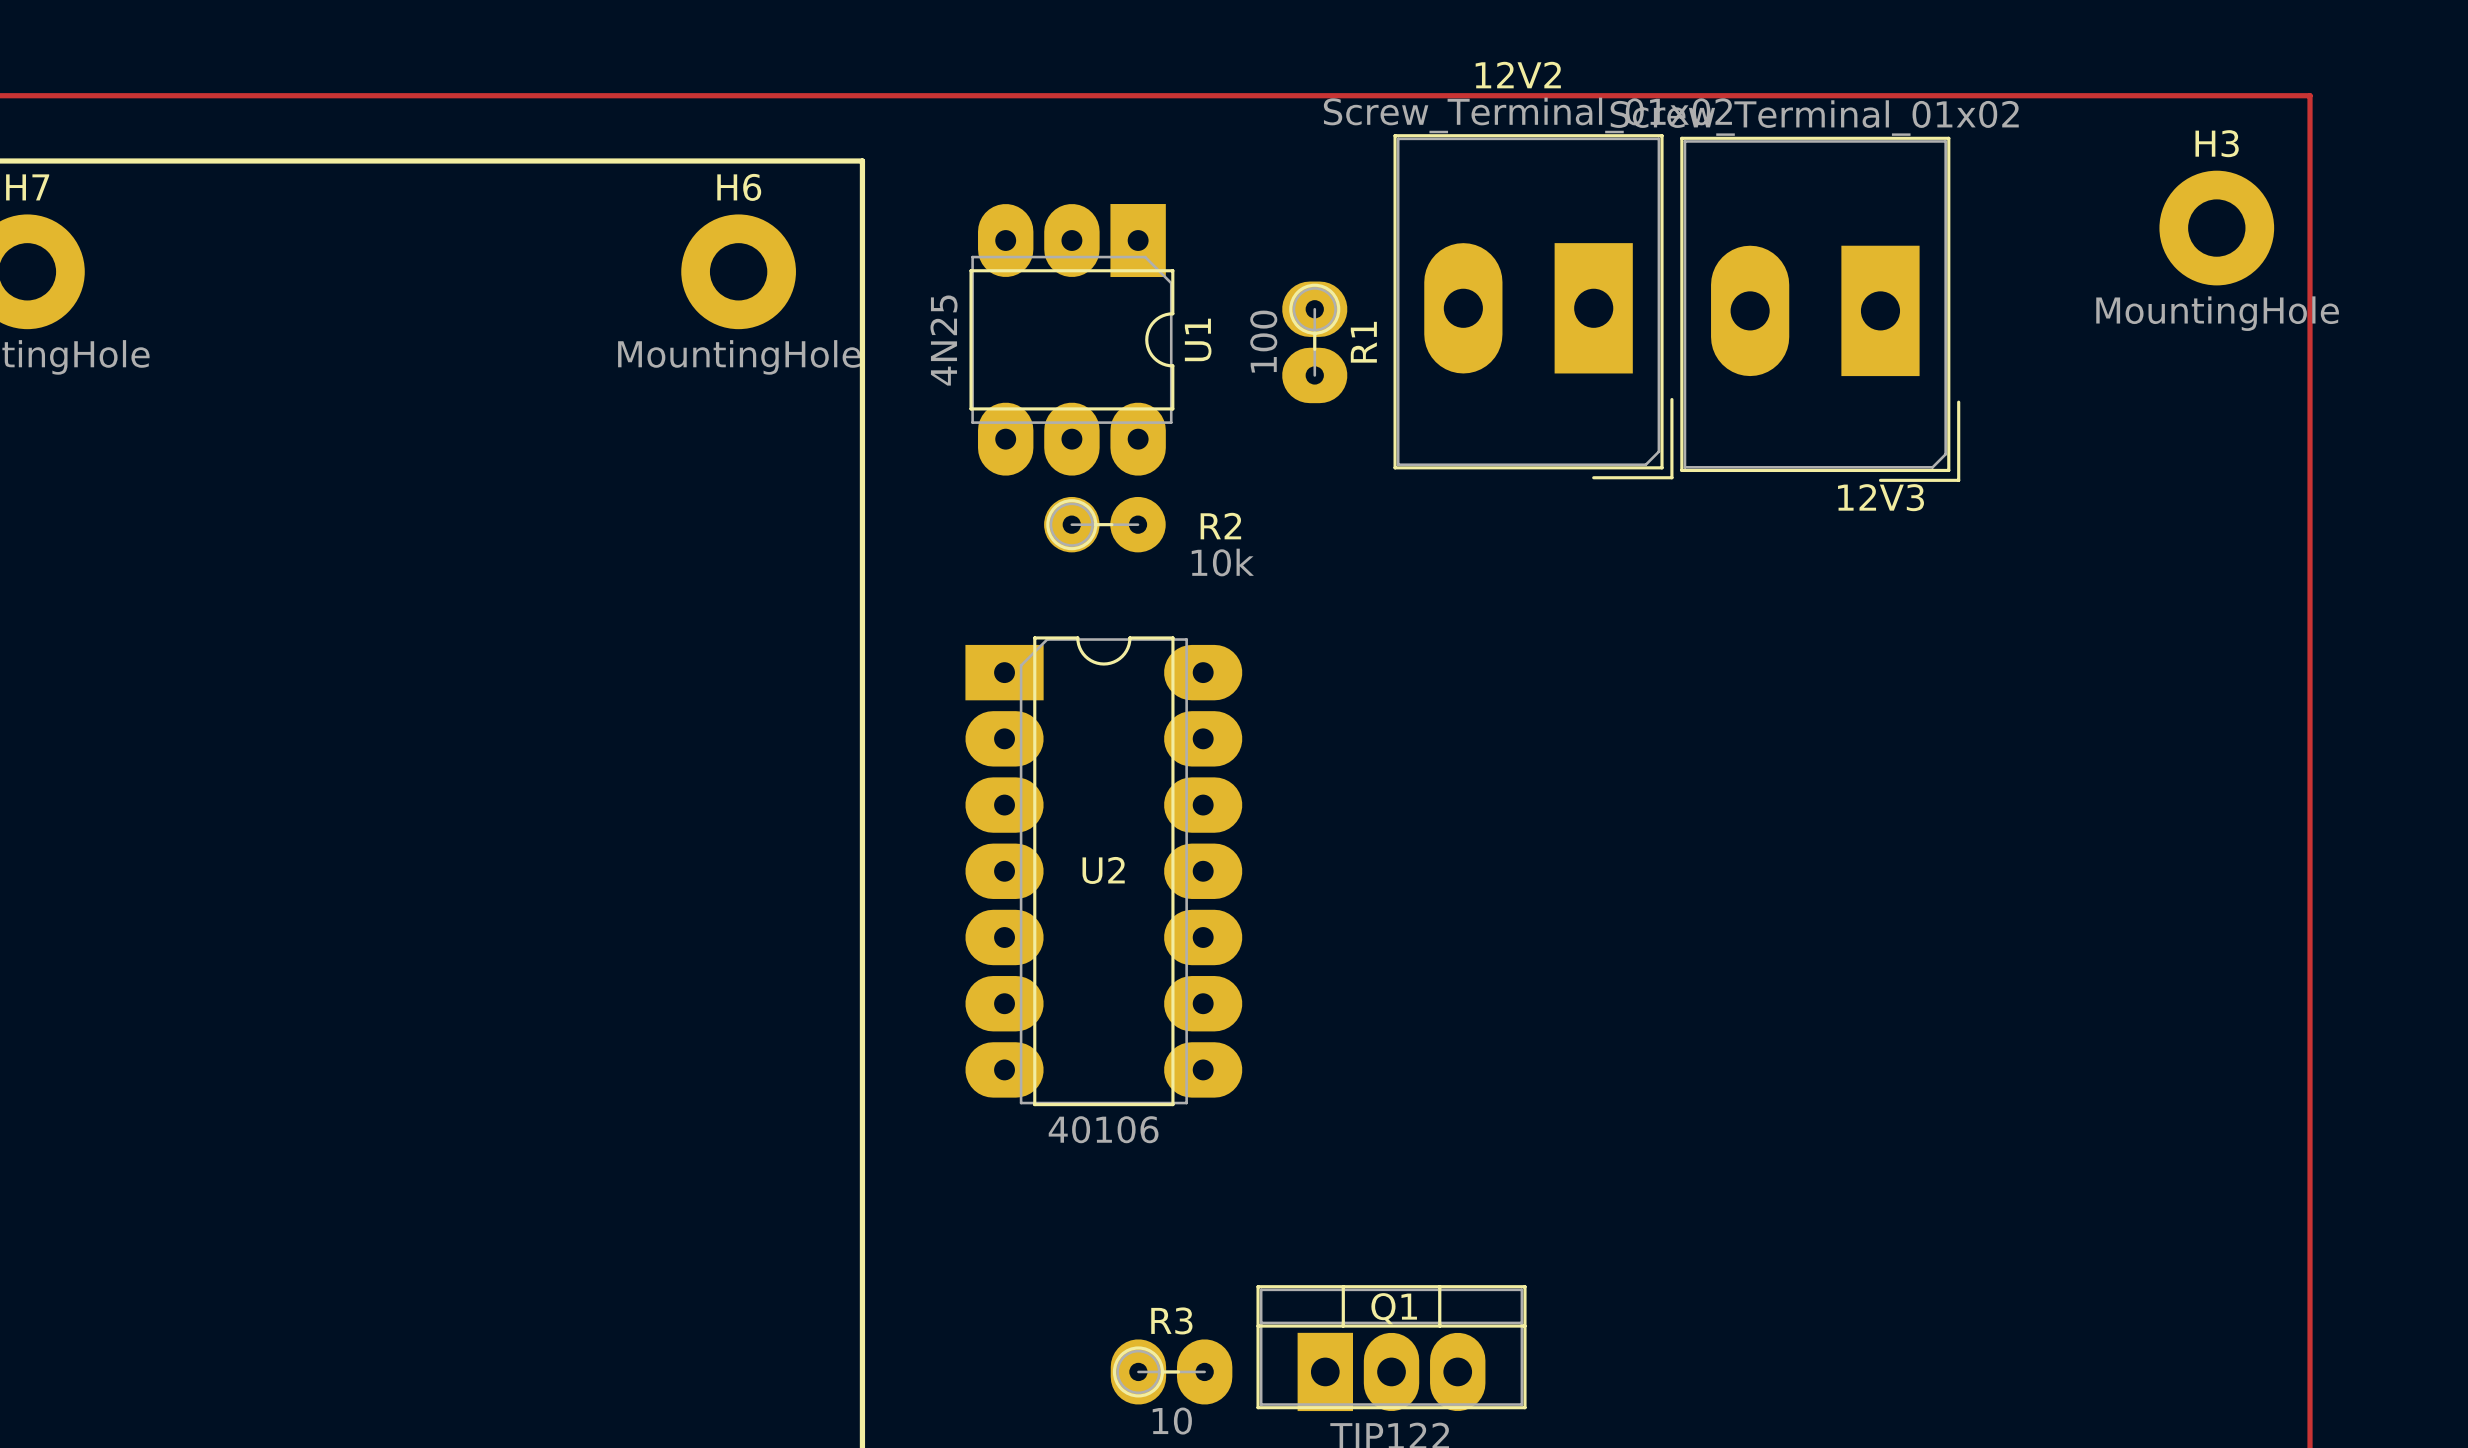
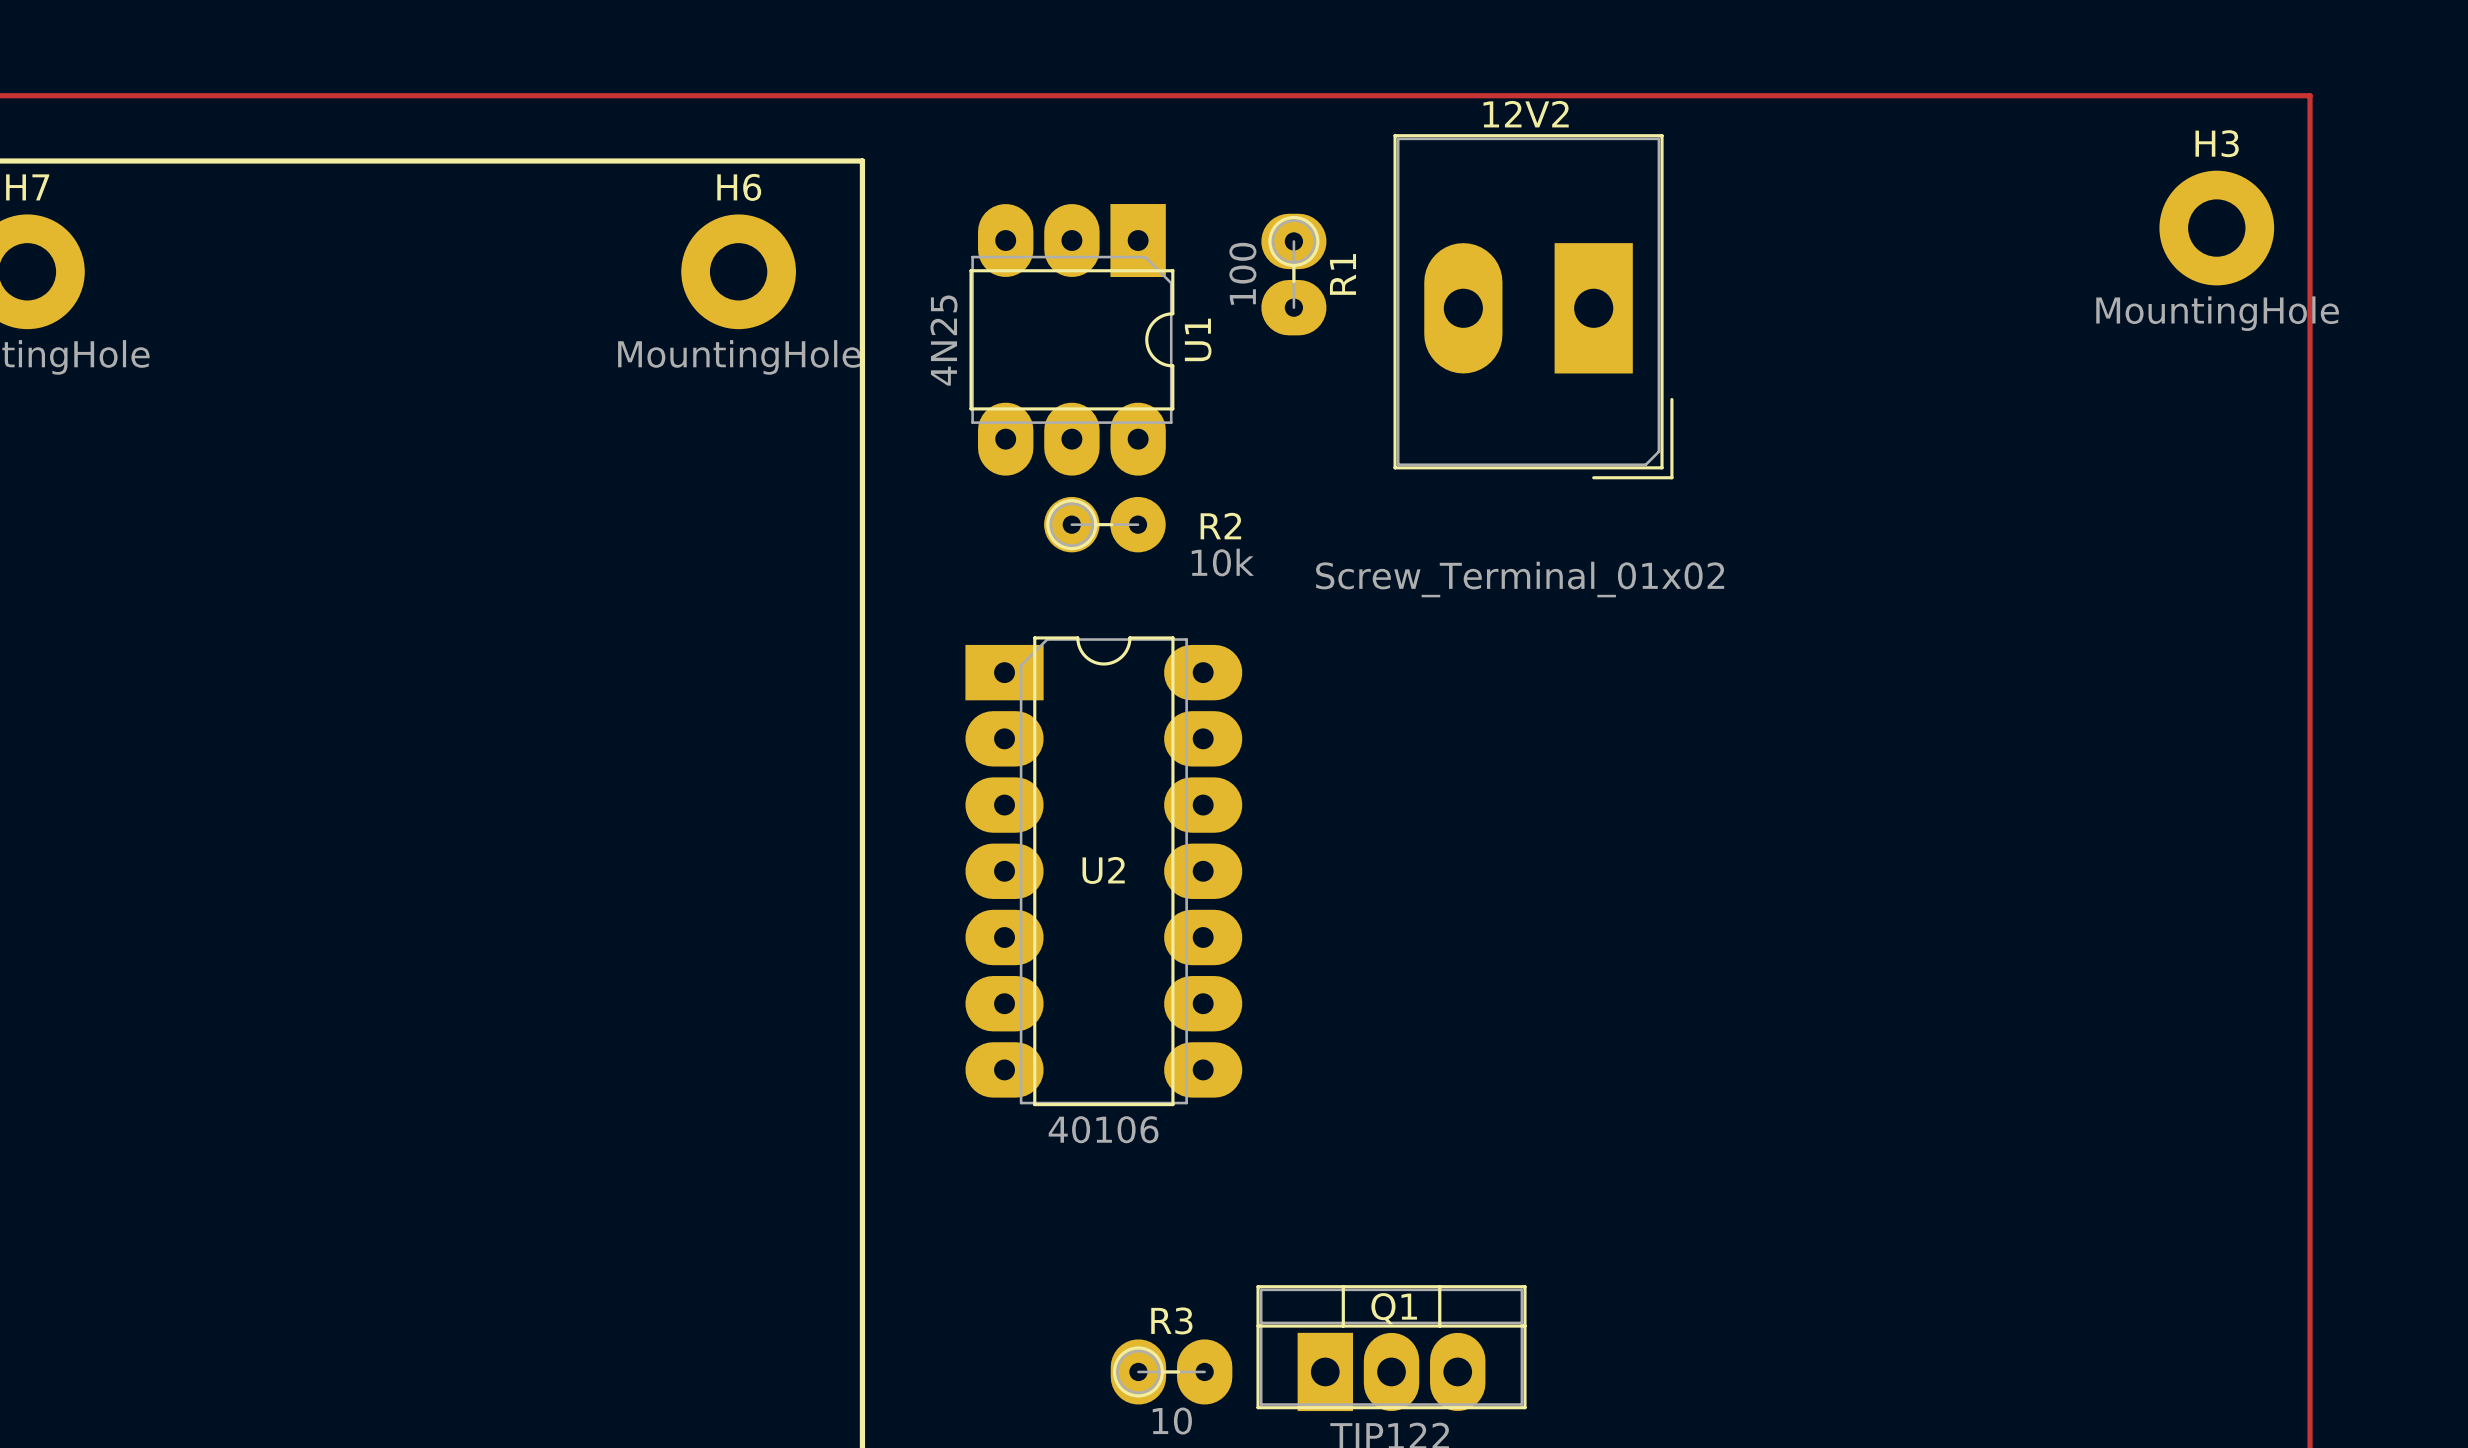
12V2 name position: 12V2 (1518, 75) -> 12V2 (1526, 114)
12V2 value position: Screw_Terminal_01x02 (1527, 115) -> Screw_Terminal_01x02 (1520, 579)
12V3: Screw_Terminal_01x02 (1820, 309) -> none
R1 position: (1314, 342) -> (1293, 274)

